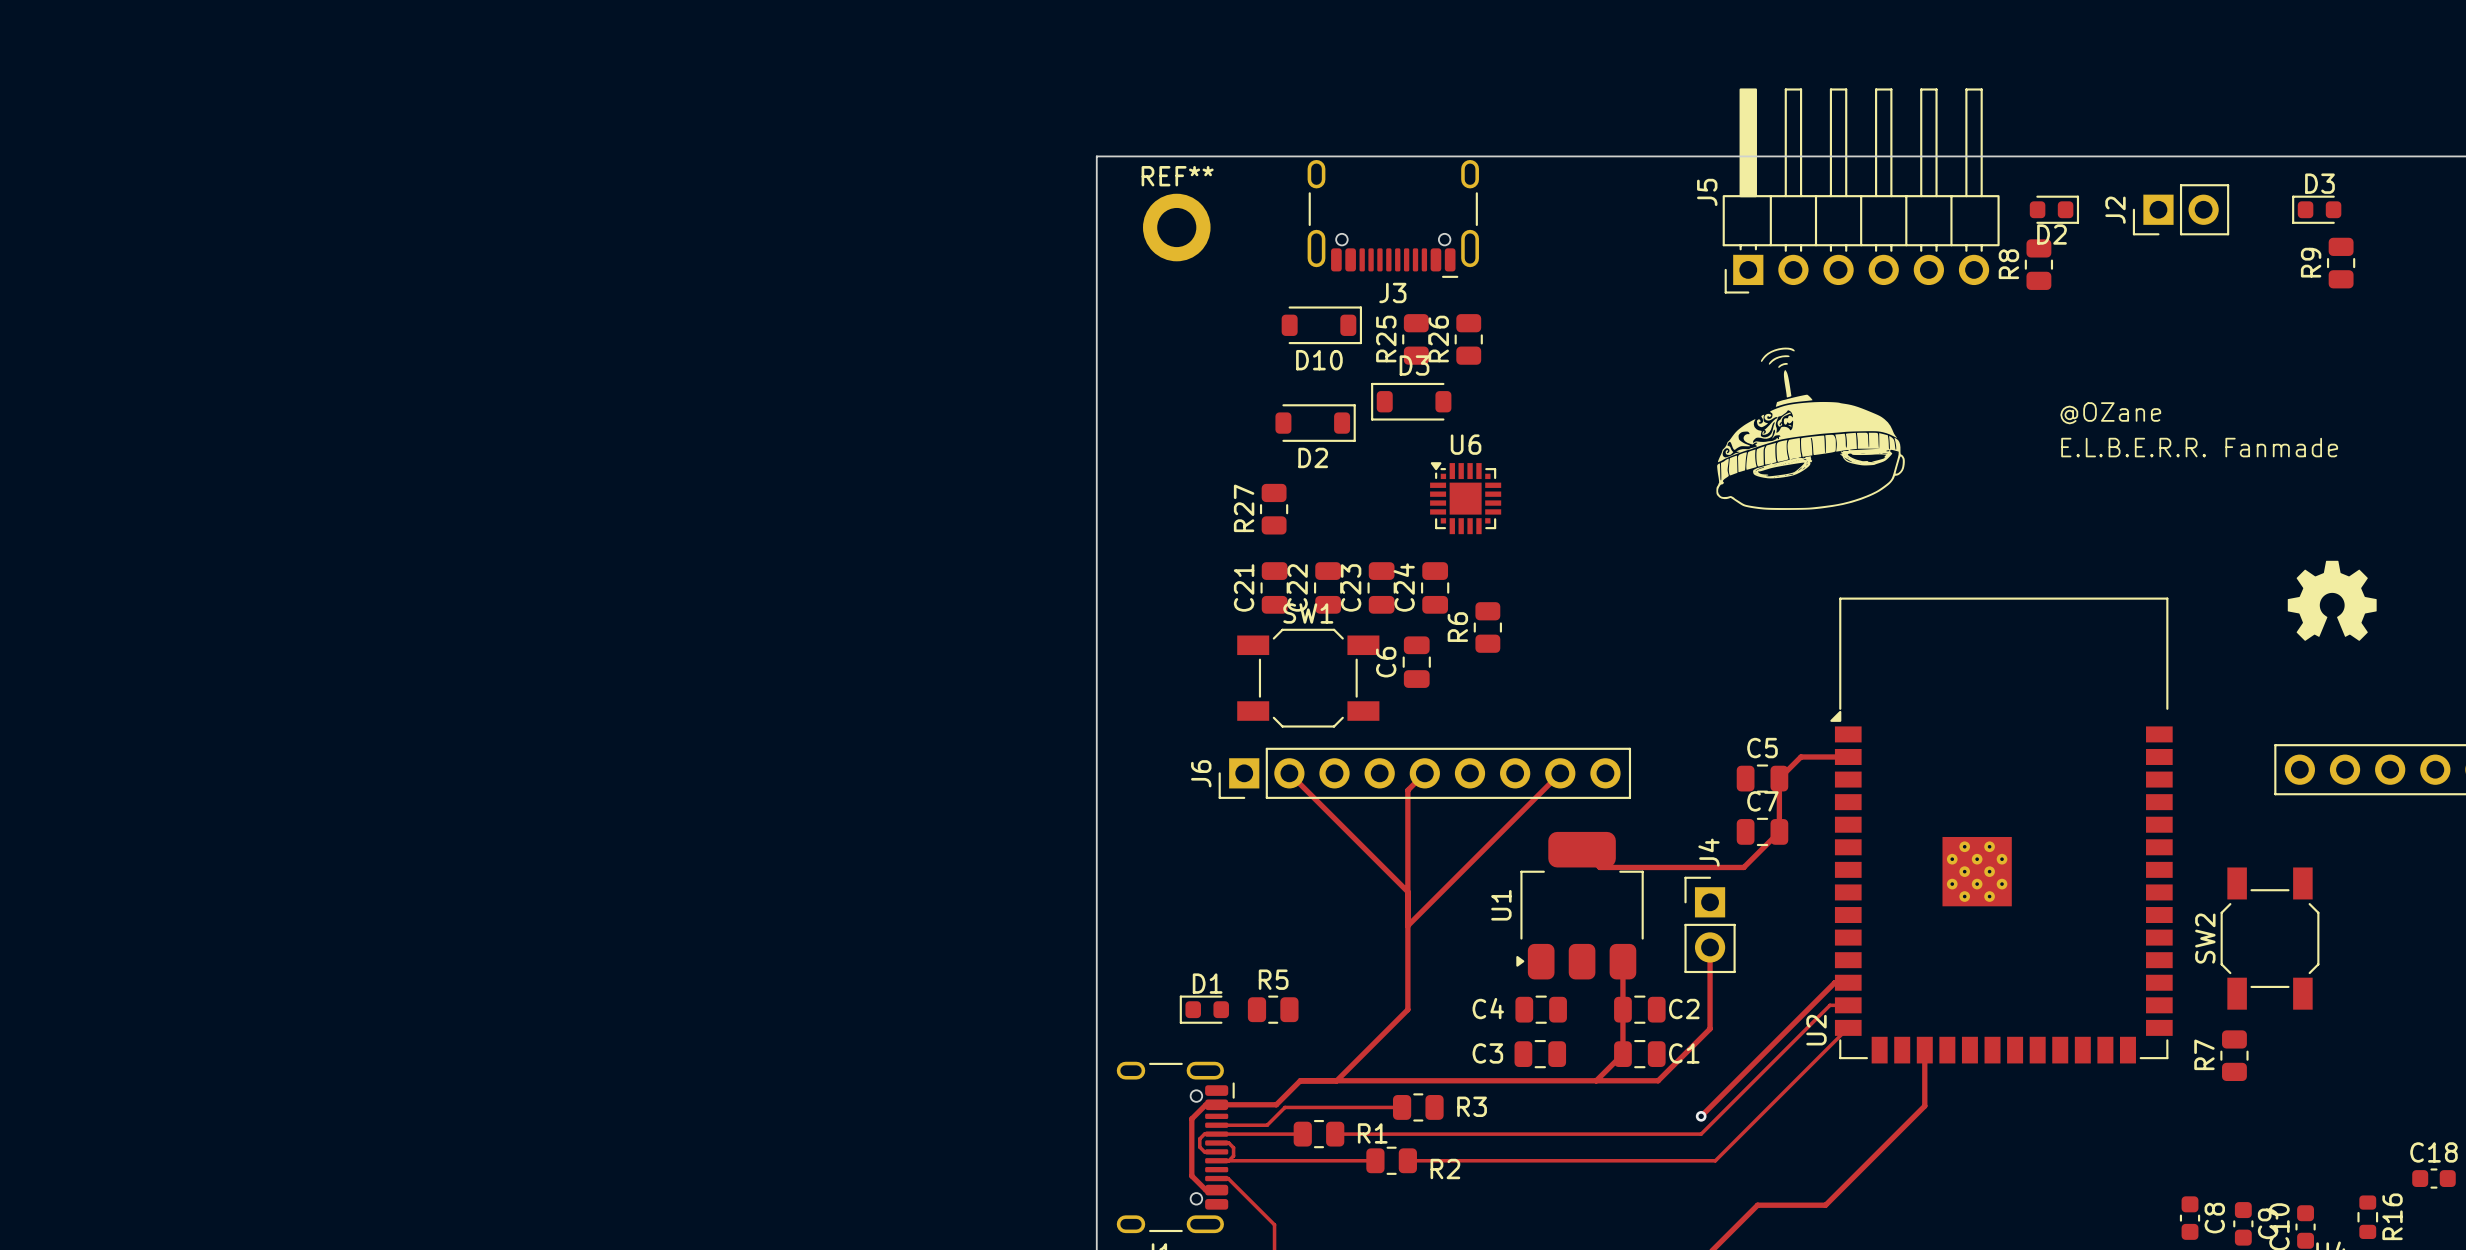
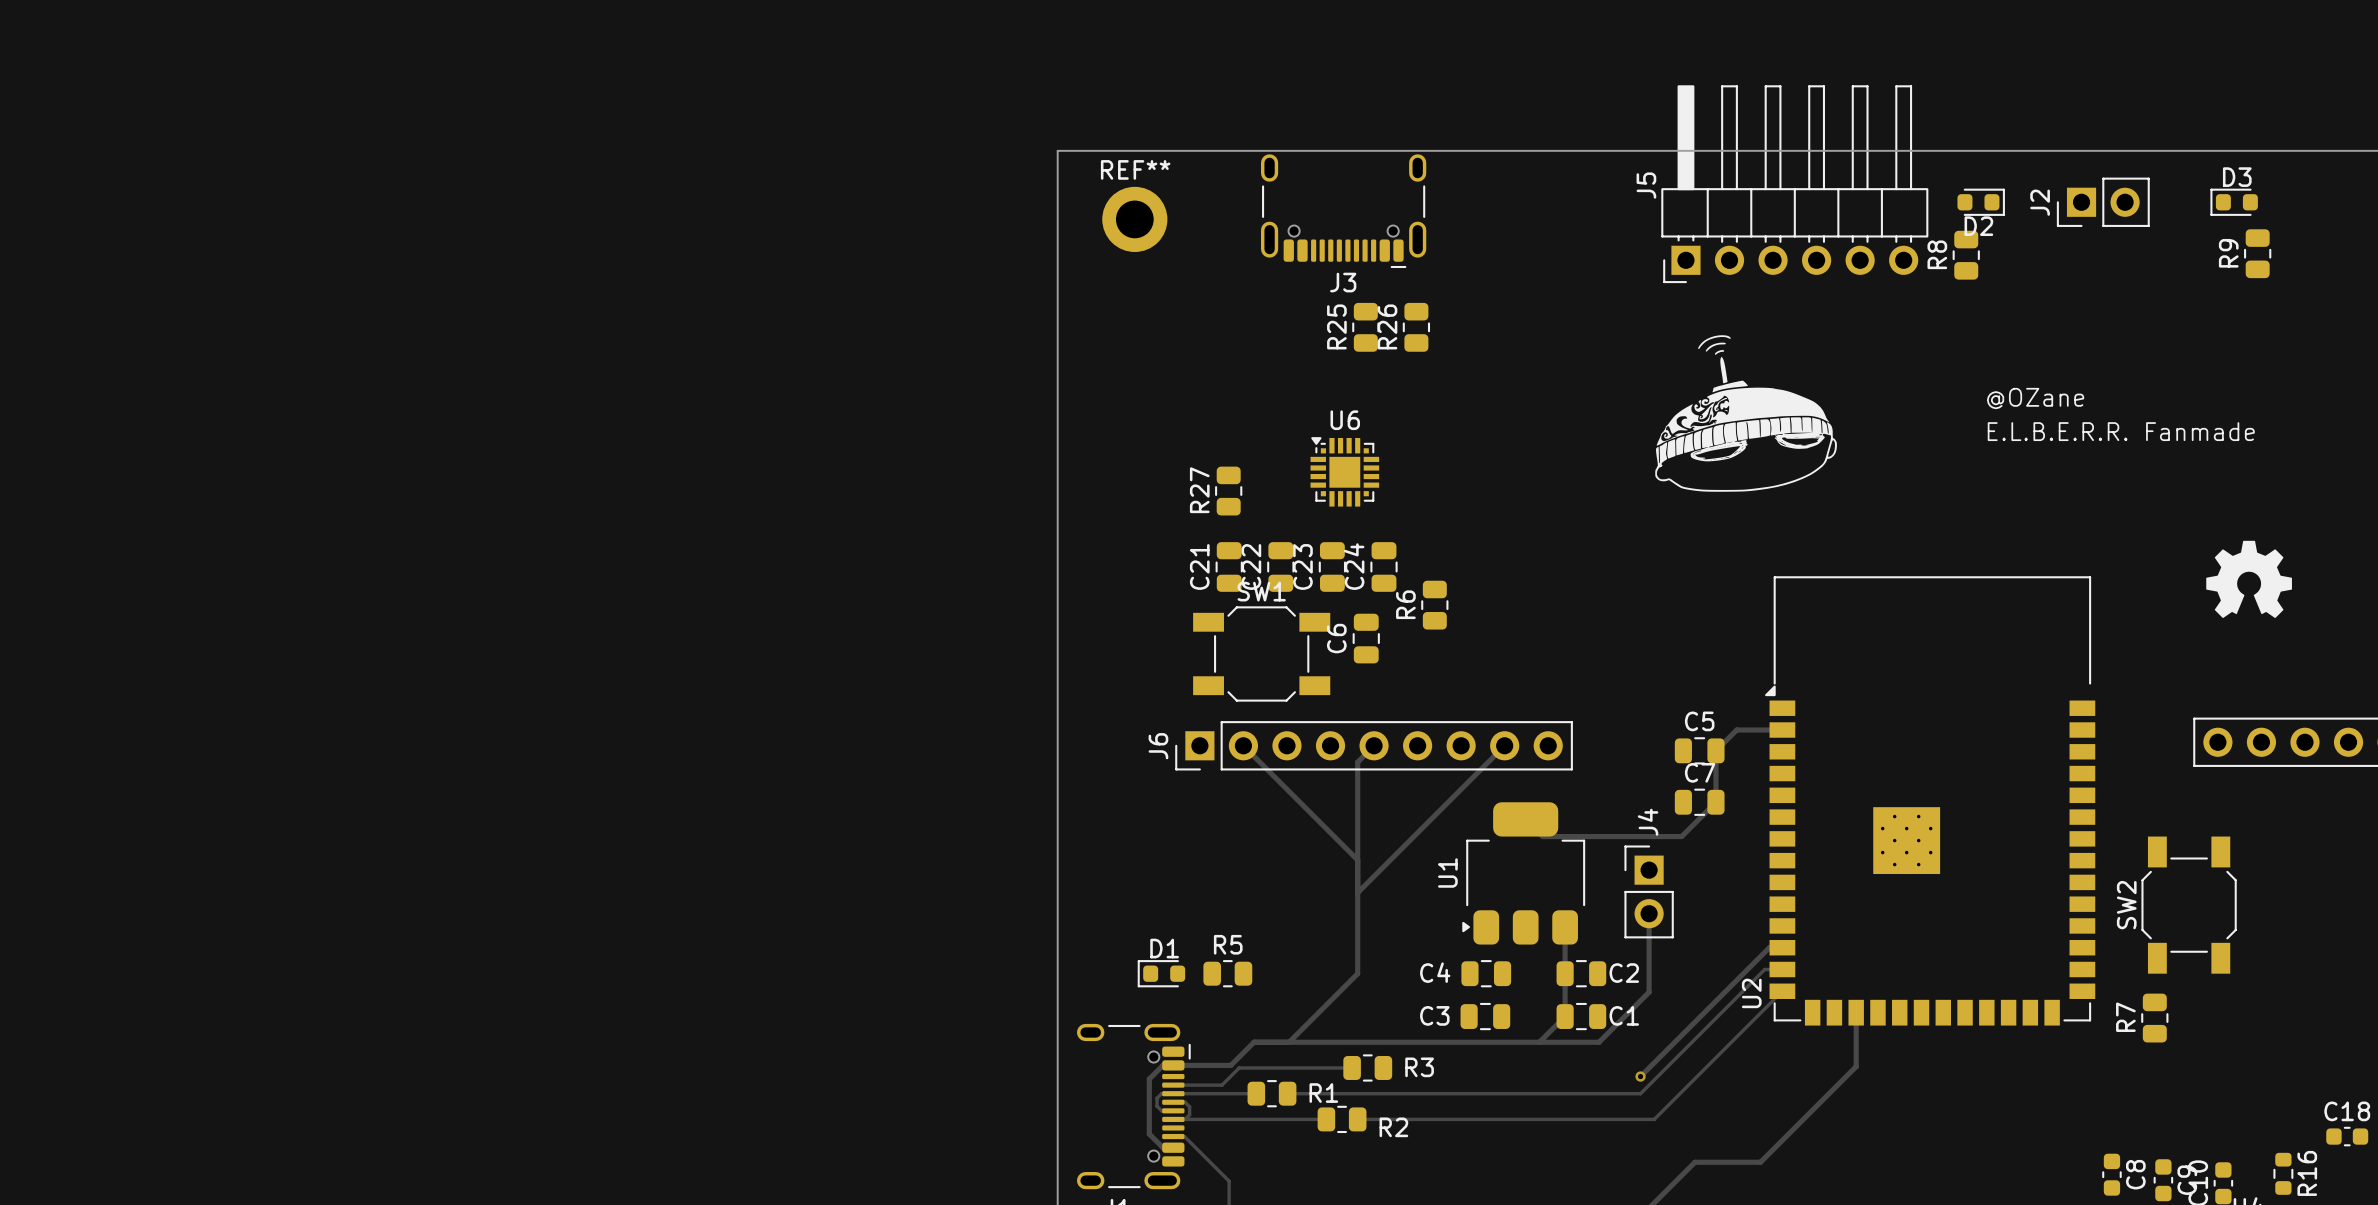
D10: (1321, 325) -> none
D3: (1411, 401) -> none
D2: (1315, 423) -> none
U6 position: (1465, 498) -> (1344, 471)

